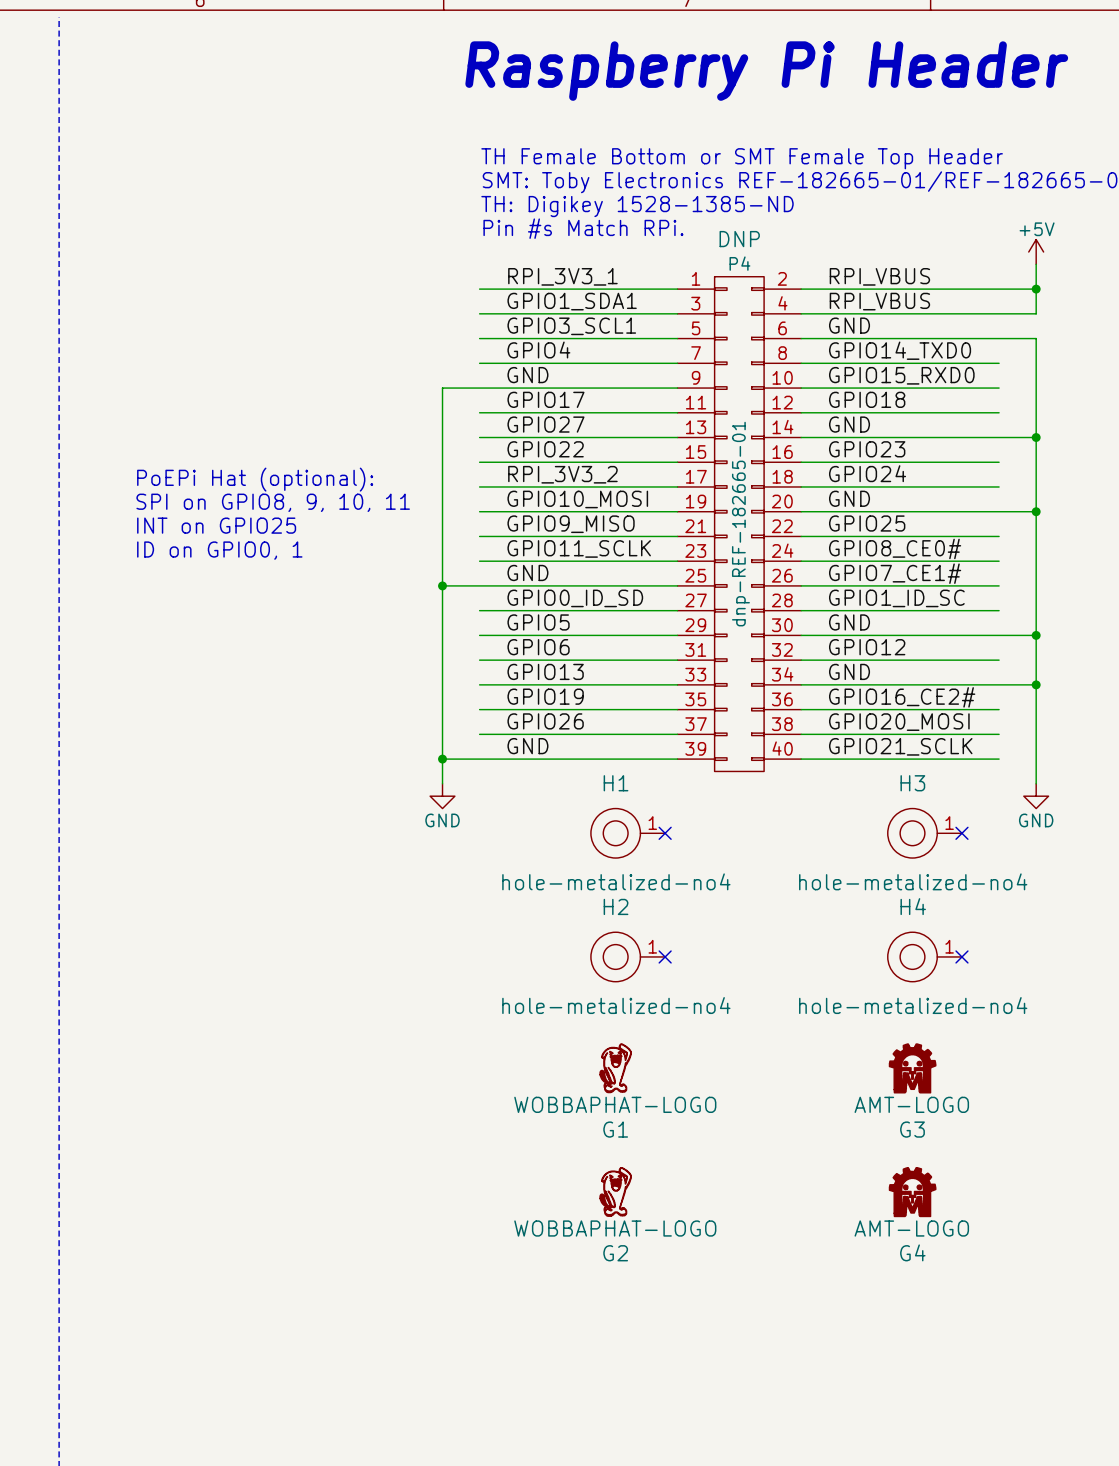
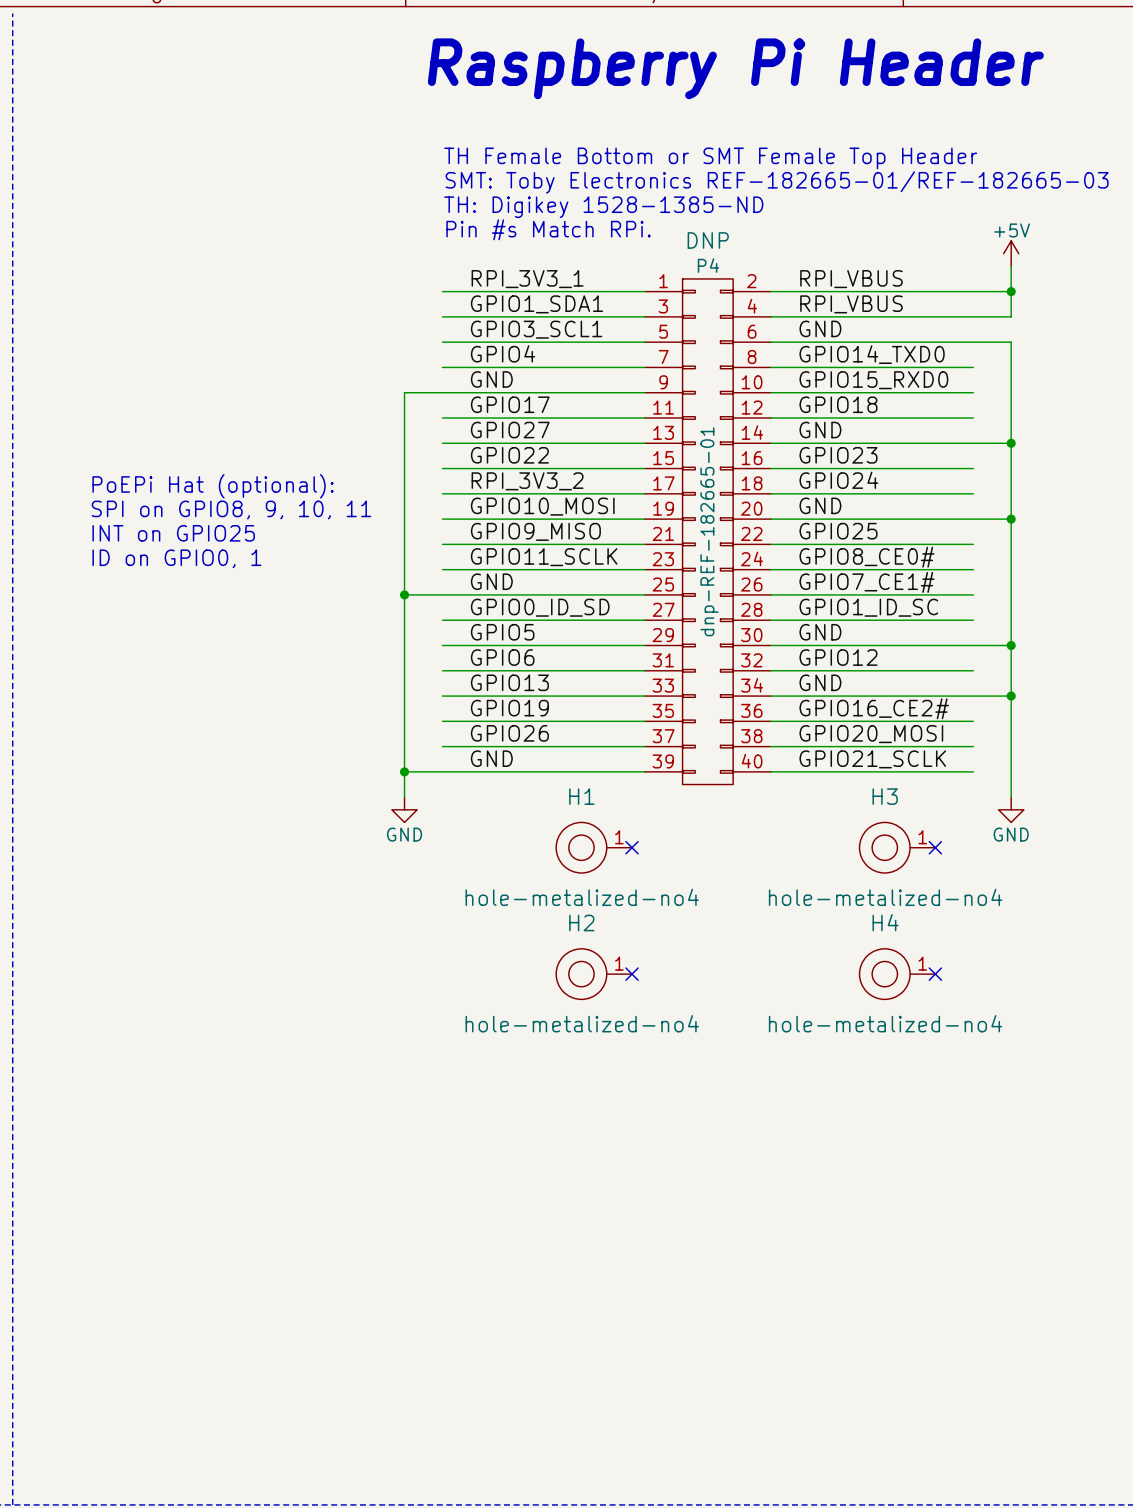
G1: WOBBAPHAT-LOGO (615, 1068) -> none
G3: AMT-LOGO (912, 1068) -> none
G2: WOBBAPHAT-LOGO (615, 1191) -> none
G4: AMT-LOGO (912, 1192) -> none

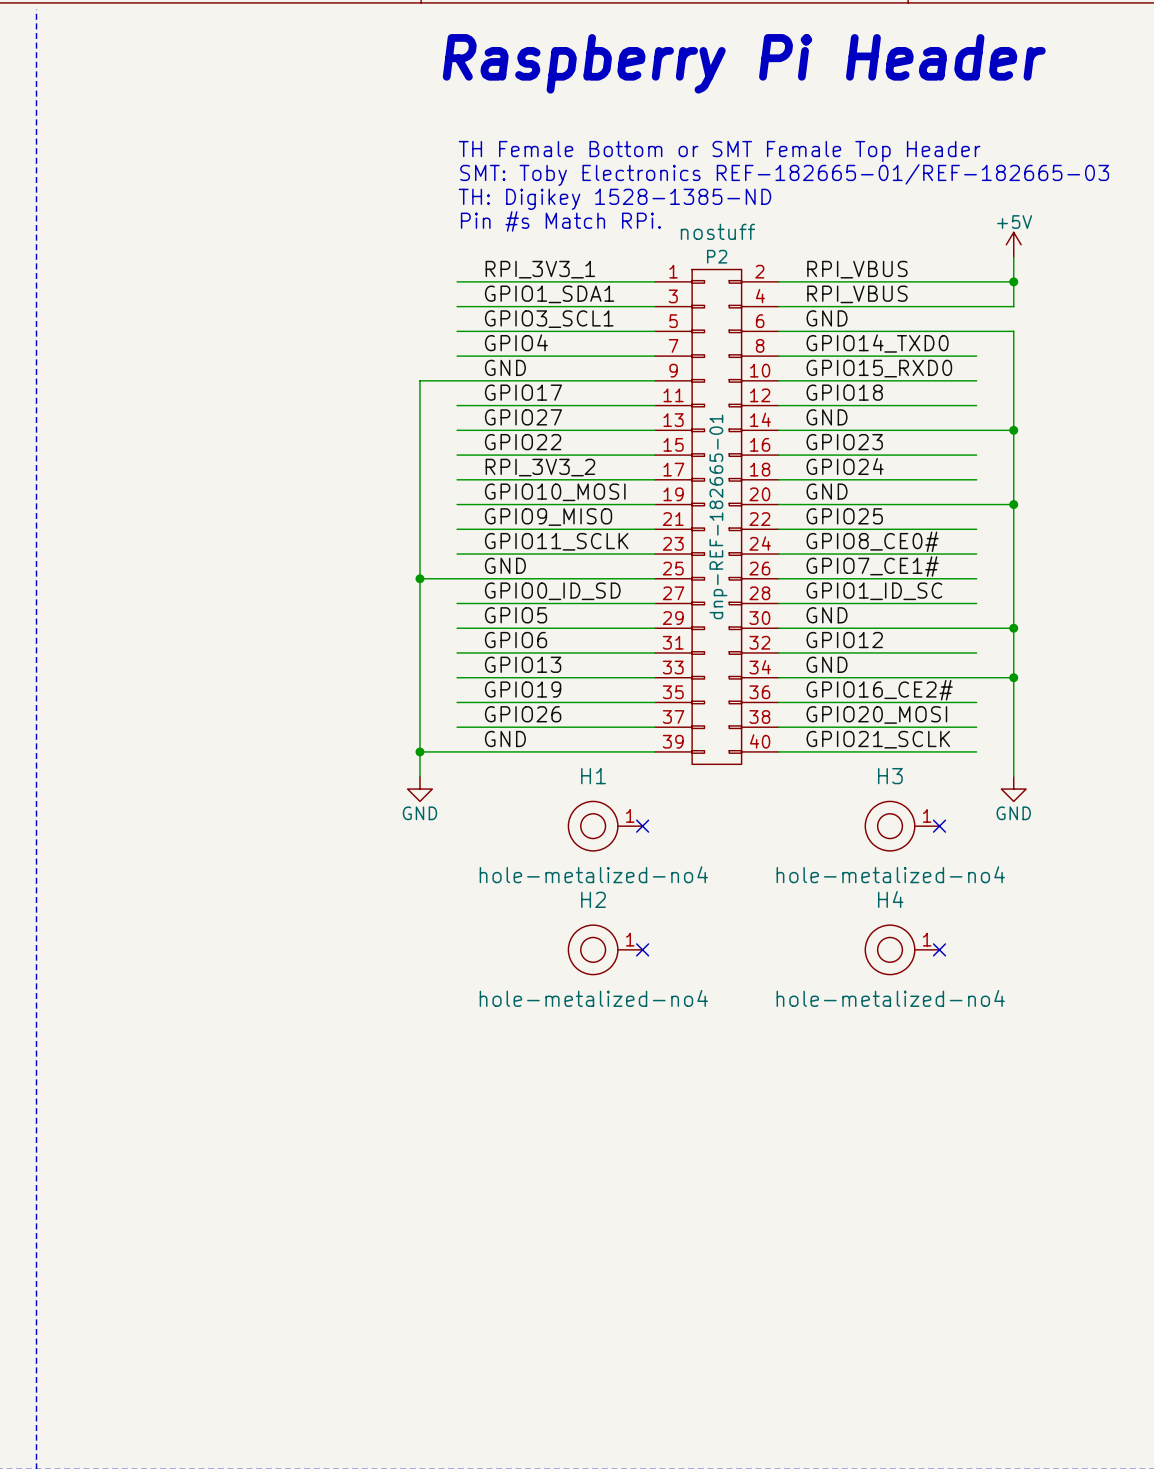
P4 text: DNP (708, 240) -> none
P4 text: none -> nostuff (717, 231)
P4 name: P4 (708, 265) -> P2 (717, 256)
text: PoEPi Hat (optional): (213, 486) -> none
text: SPI on GPIO8, 9, 10, 11 (231, 509) -> none
text: INT on GPIO25 (173, 533) -> none
text: ID on GPIO0, 1 (176, 558) -> none

